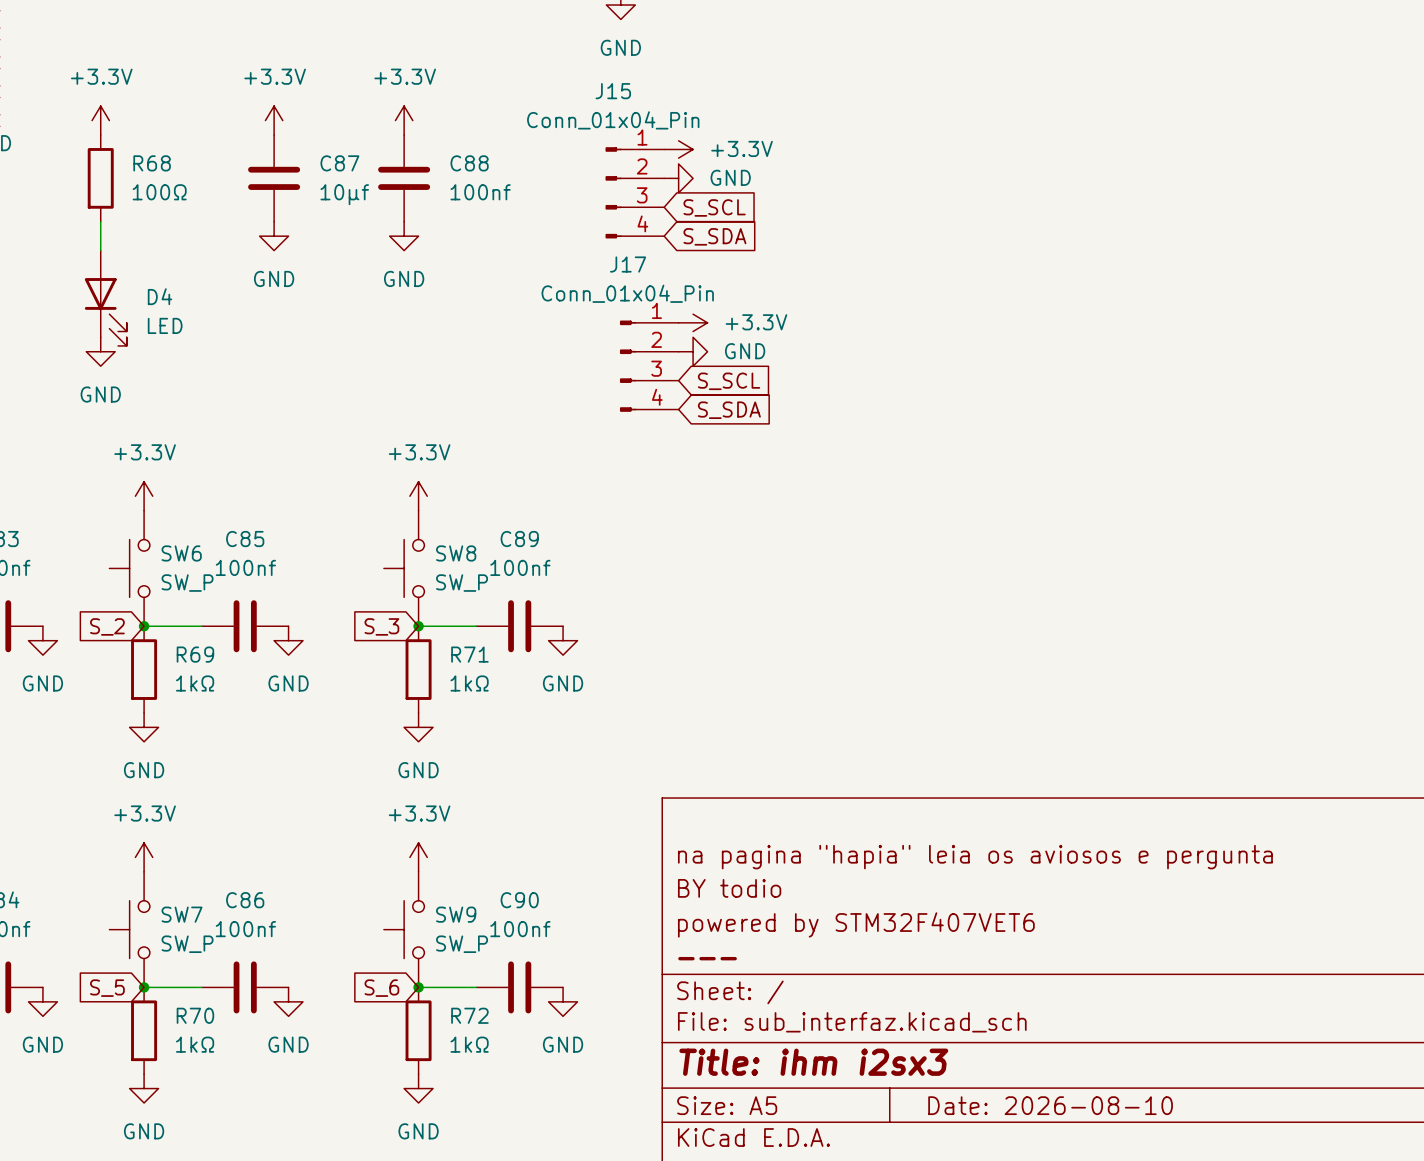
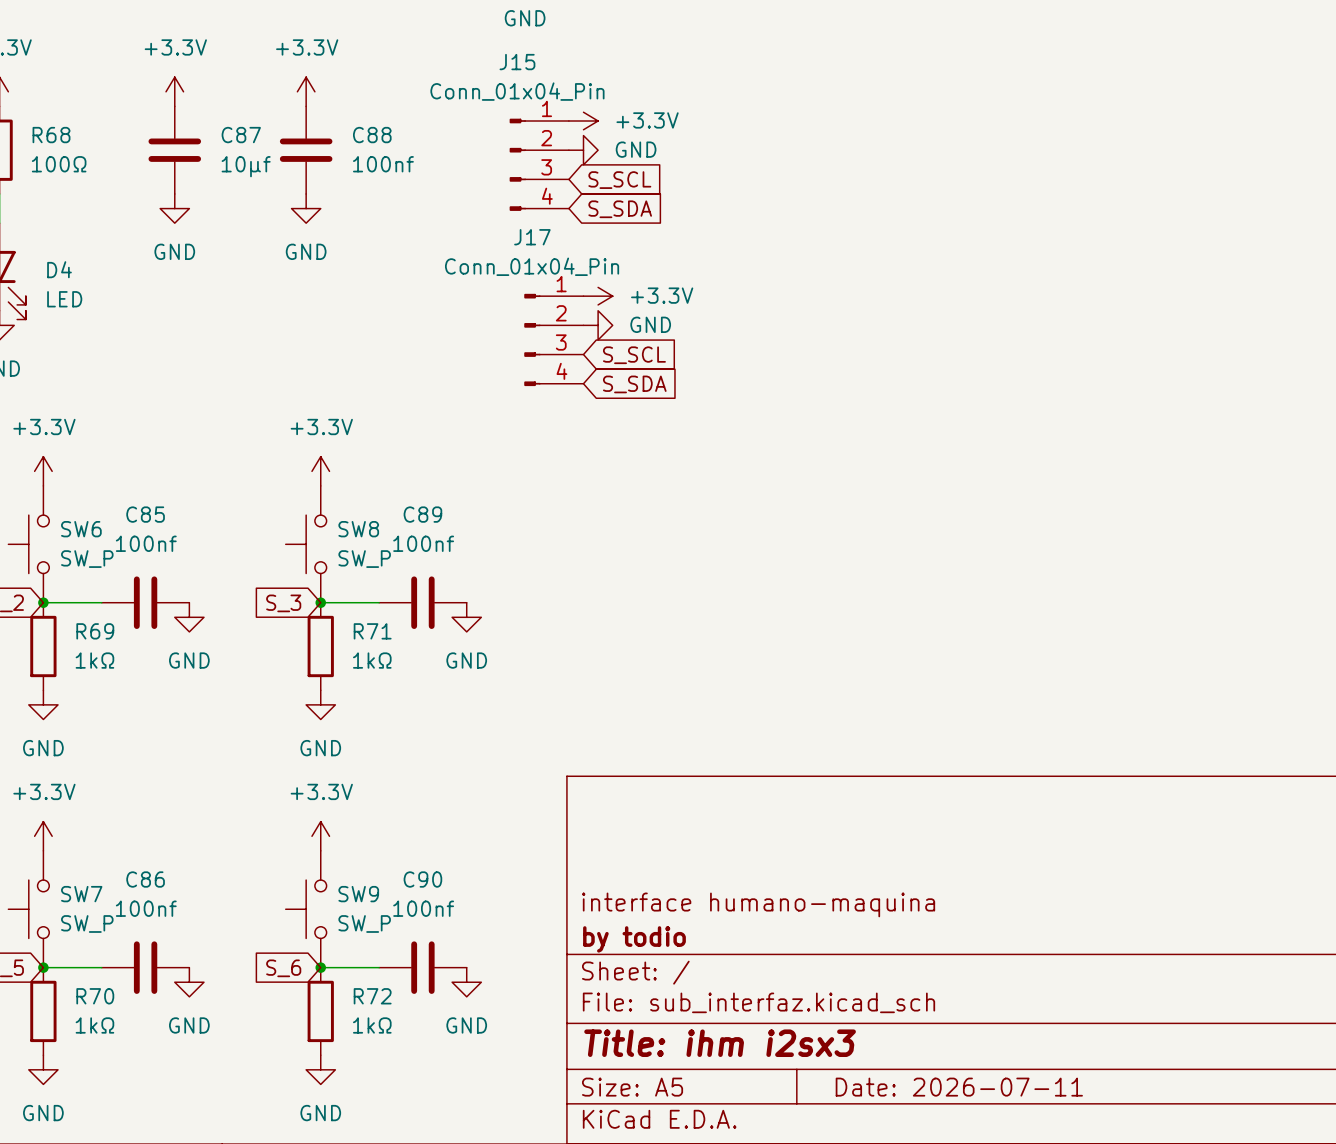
title block: na pagina "hapia" leia os aviosos e pergunta (975, 857) -> none
title block: BY todio (729, 888) -> none
title block: powered by STM32F407VET6 (856, 924) -> interface humano-maquina (758, 904)
title block: --- (707, 958) -> by todio (634, 939)
title block: Date: 2026-08-10 (1050, 1105) -> Date: 2026-07-11 (959, 1087)

